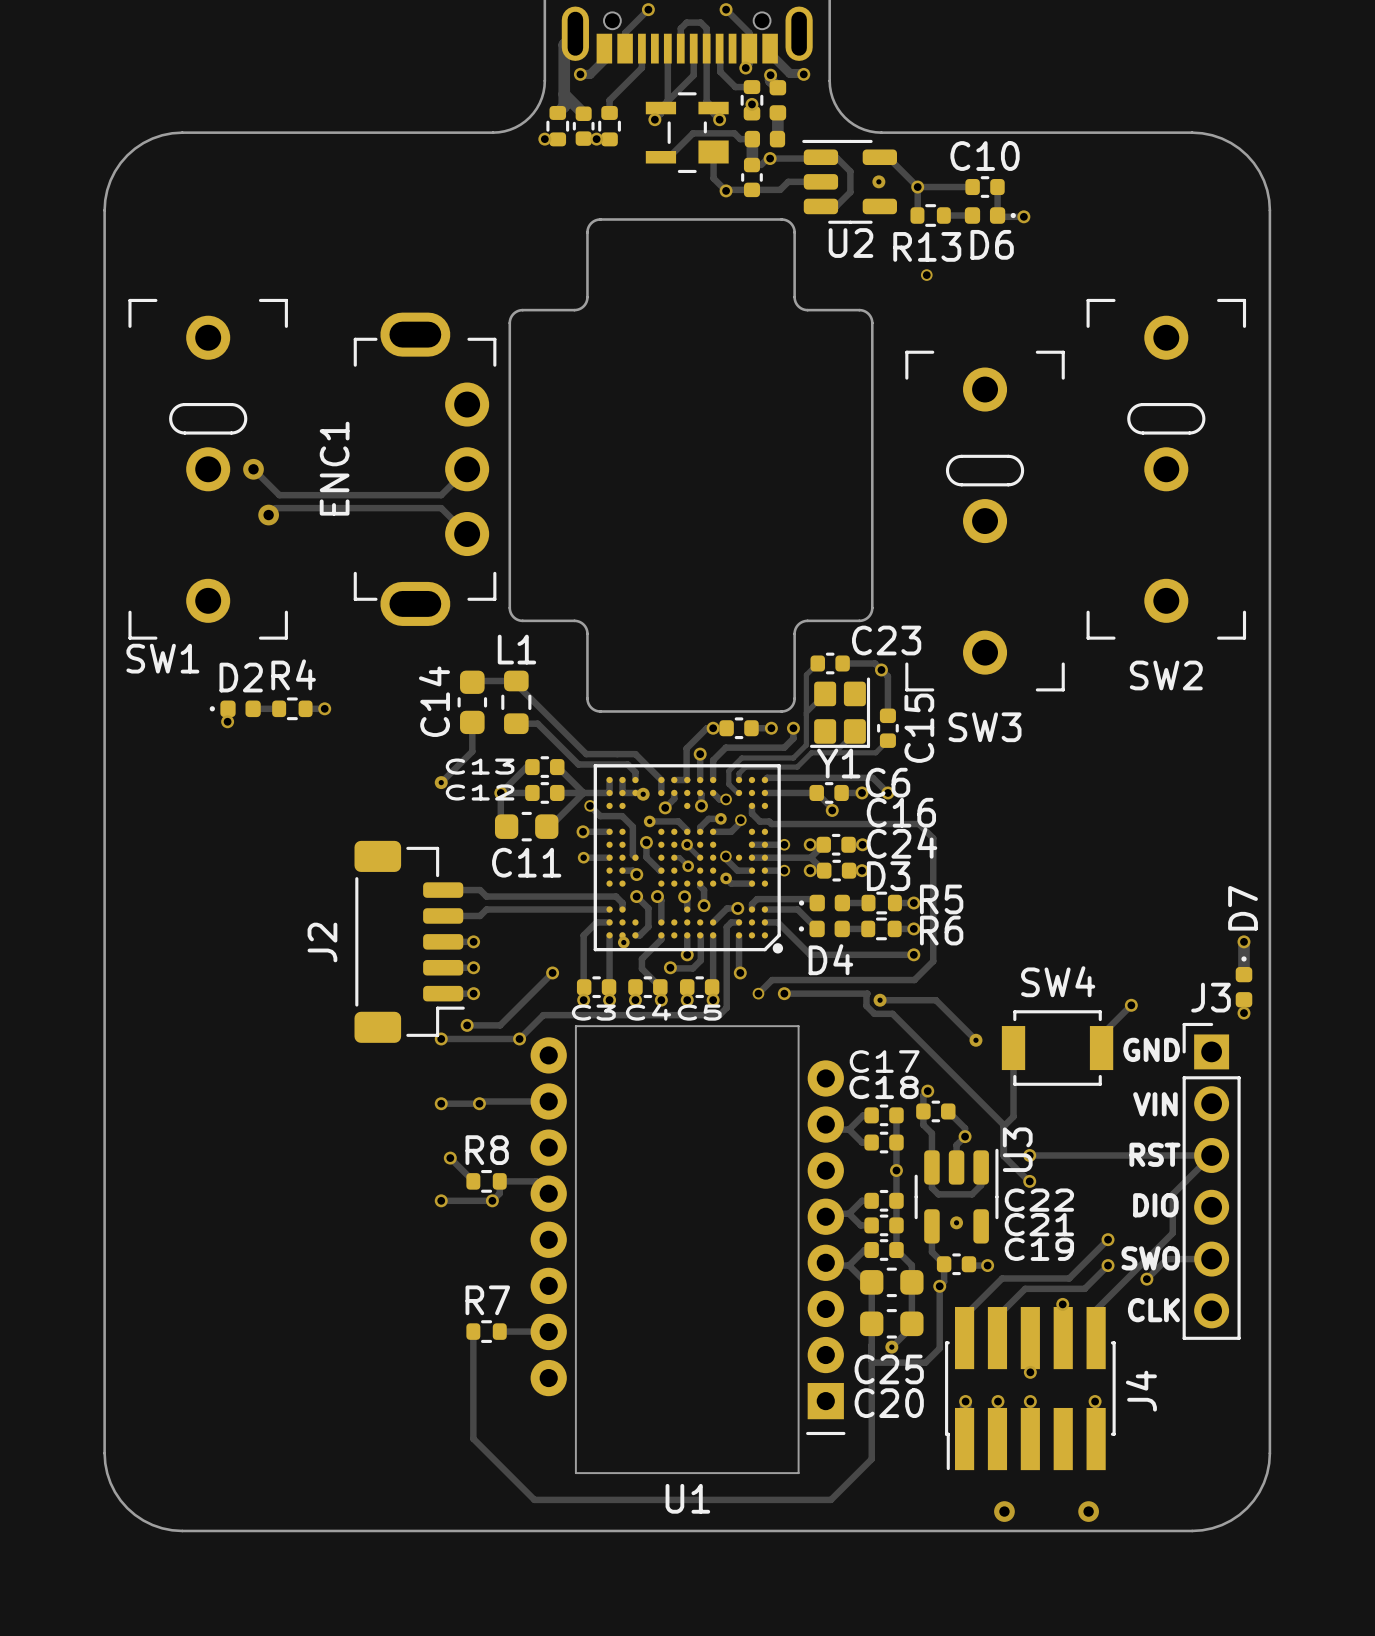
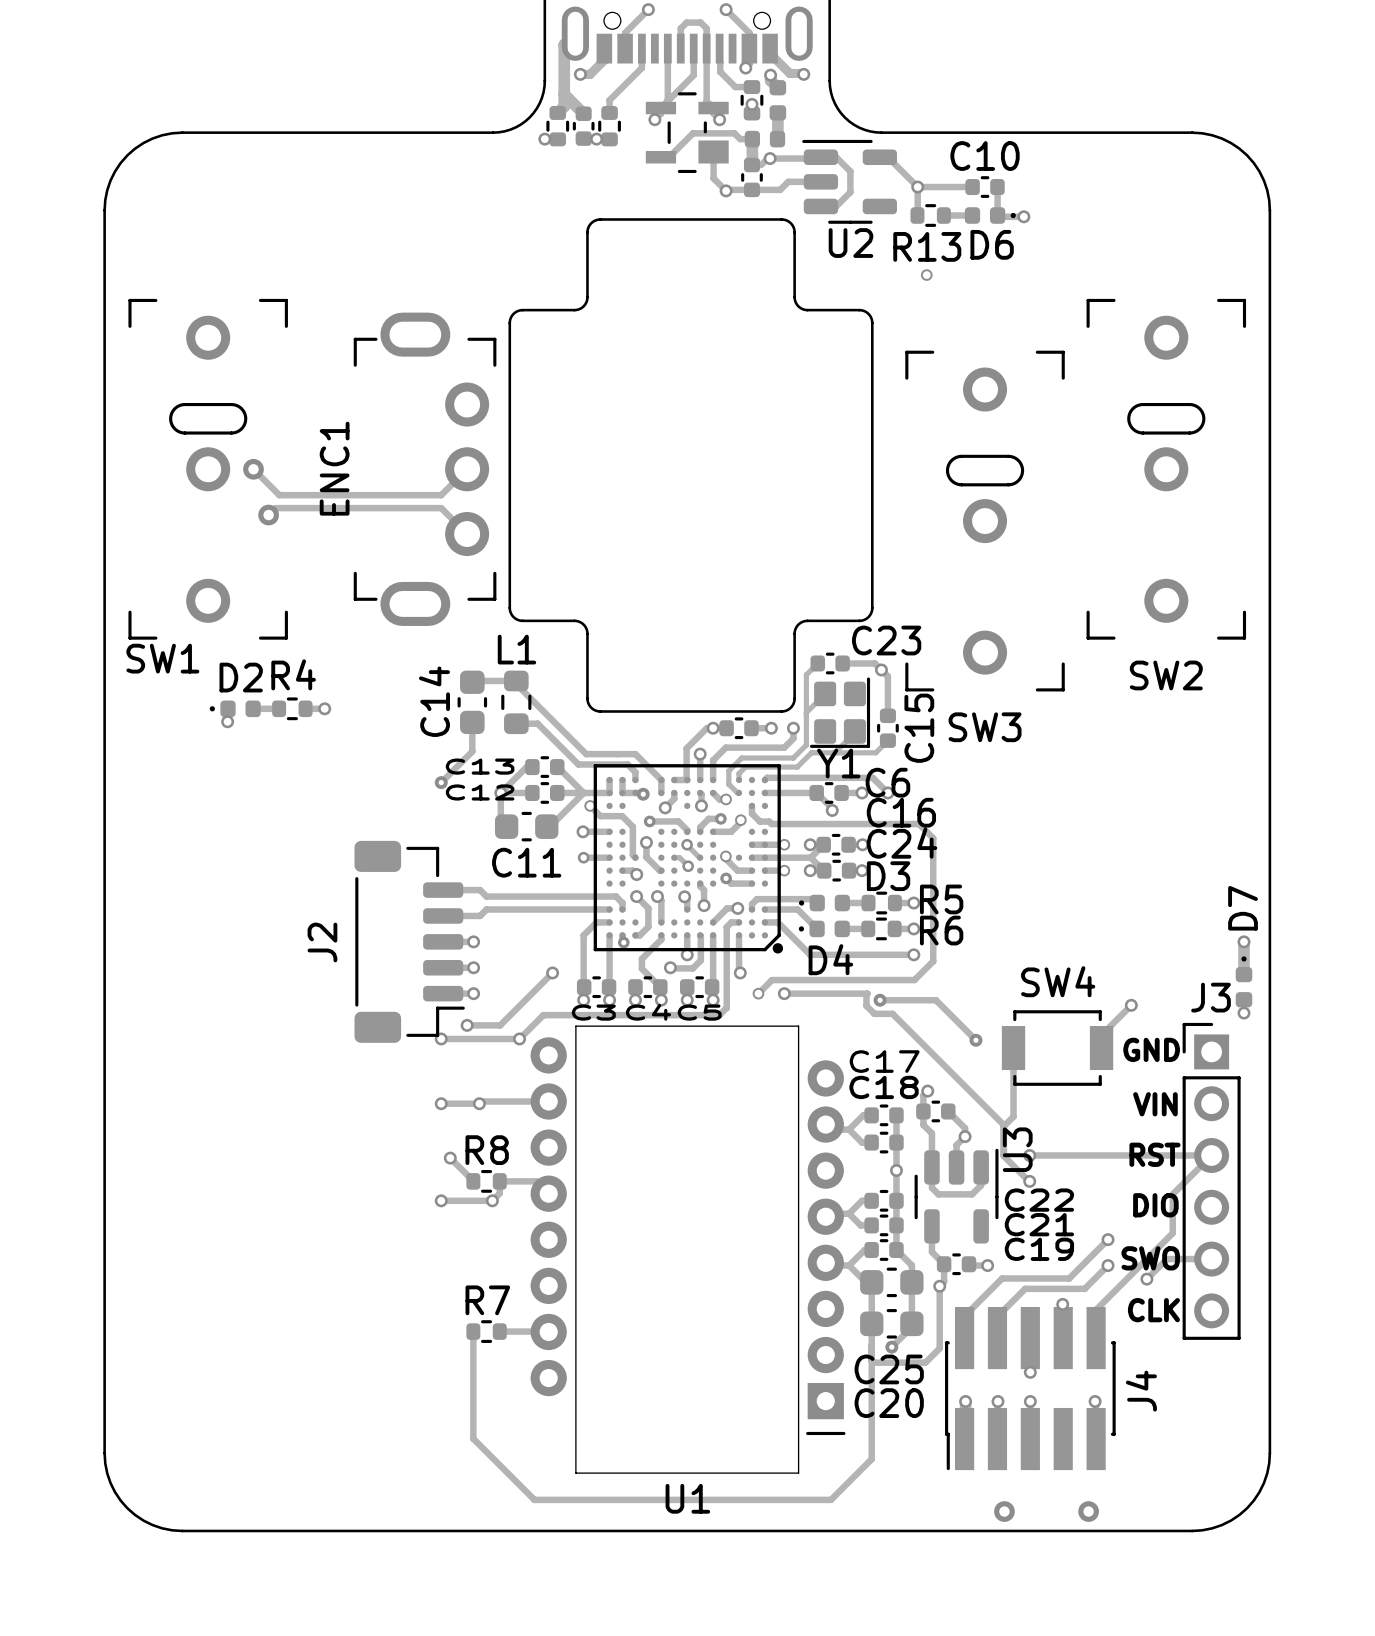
via: (878, 181) -> none
via: (956, 1222) -> none

